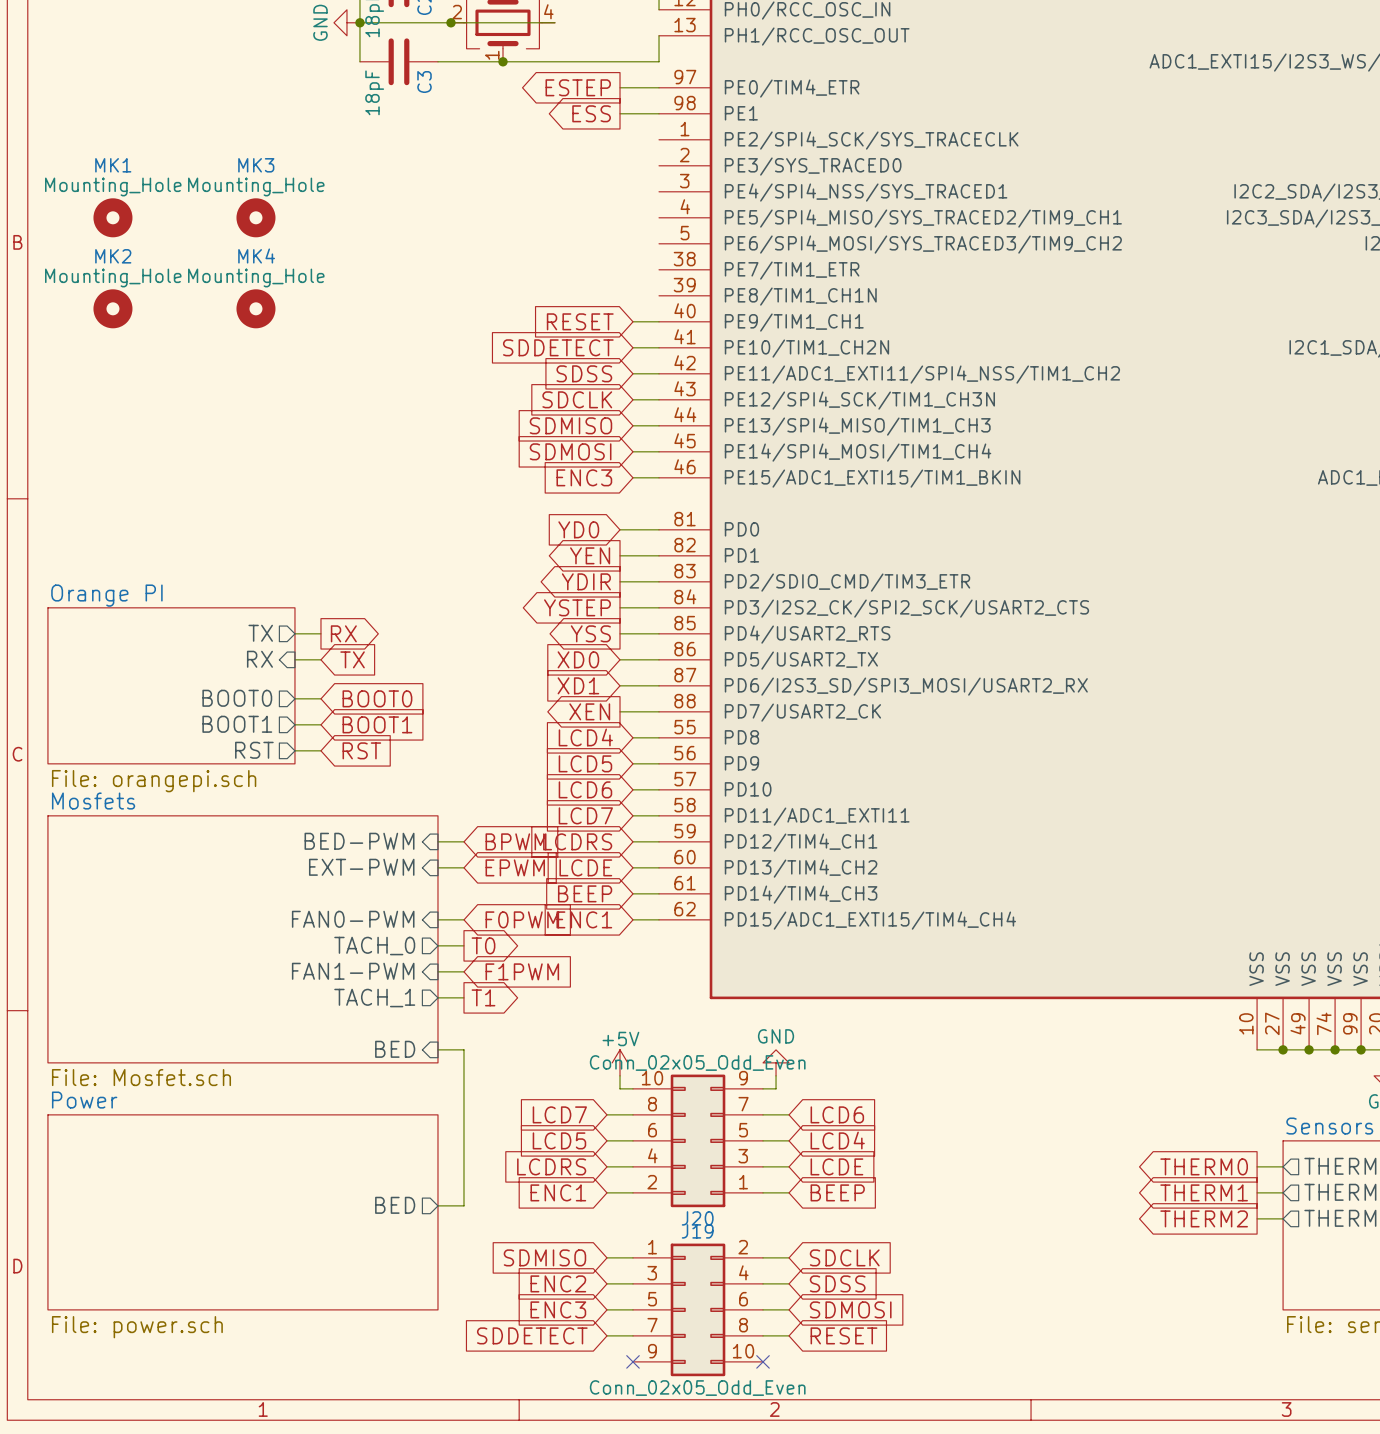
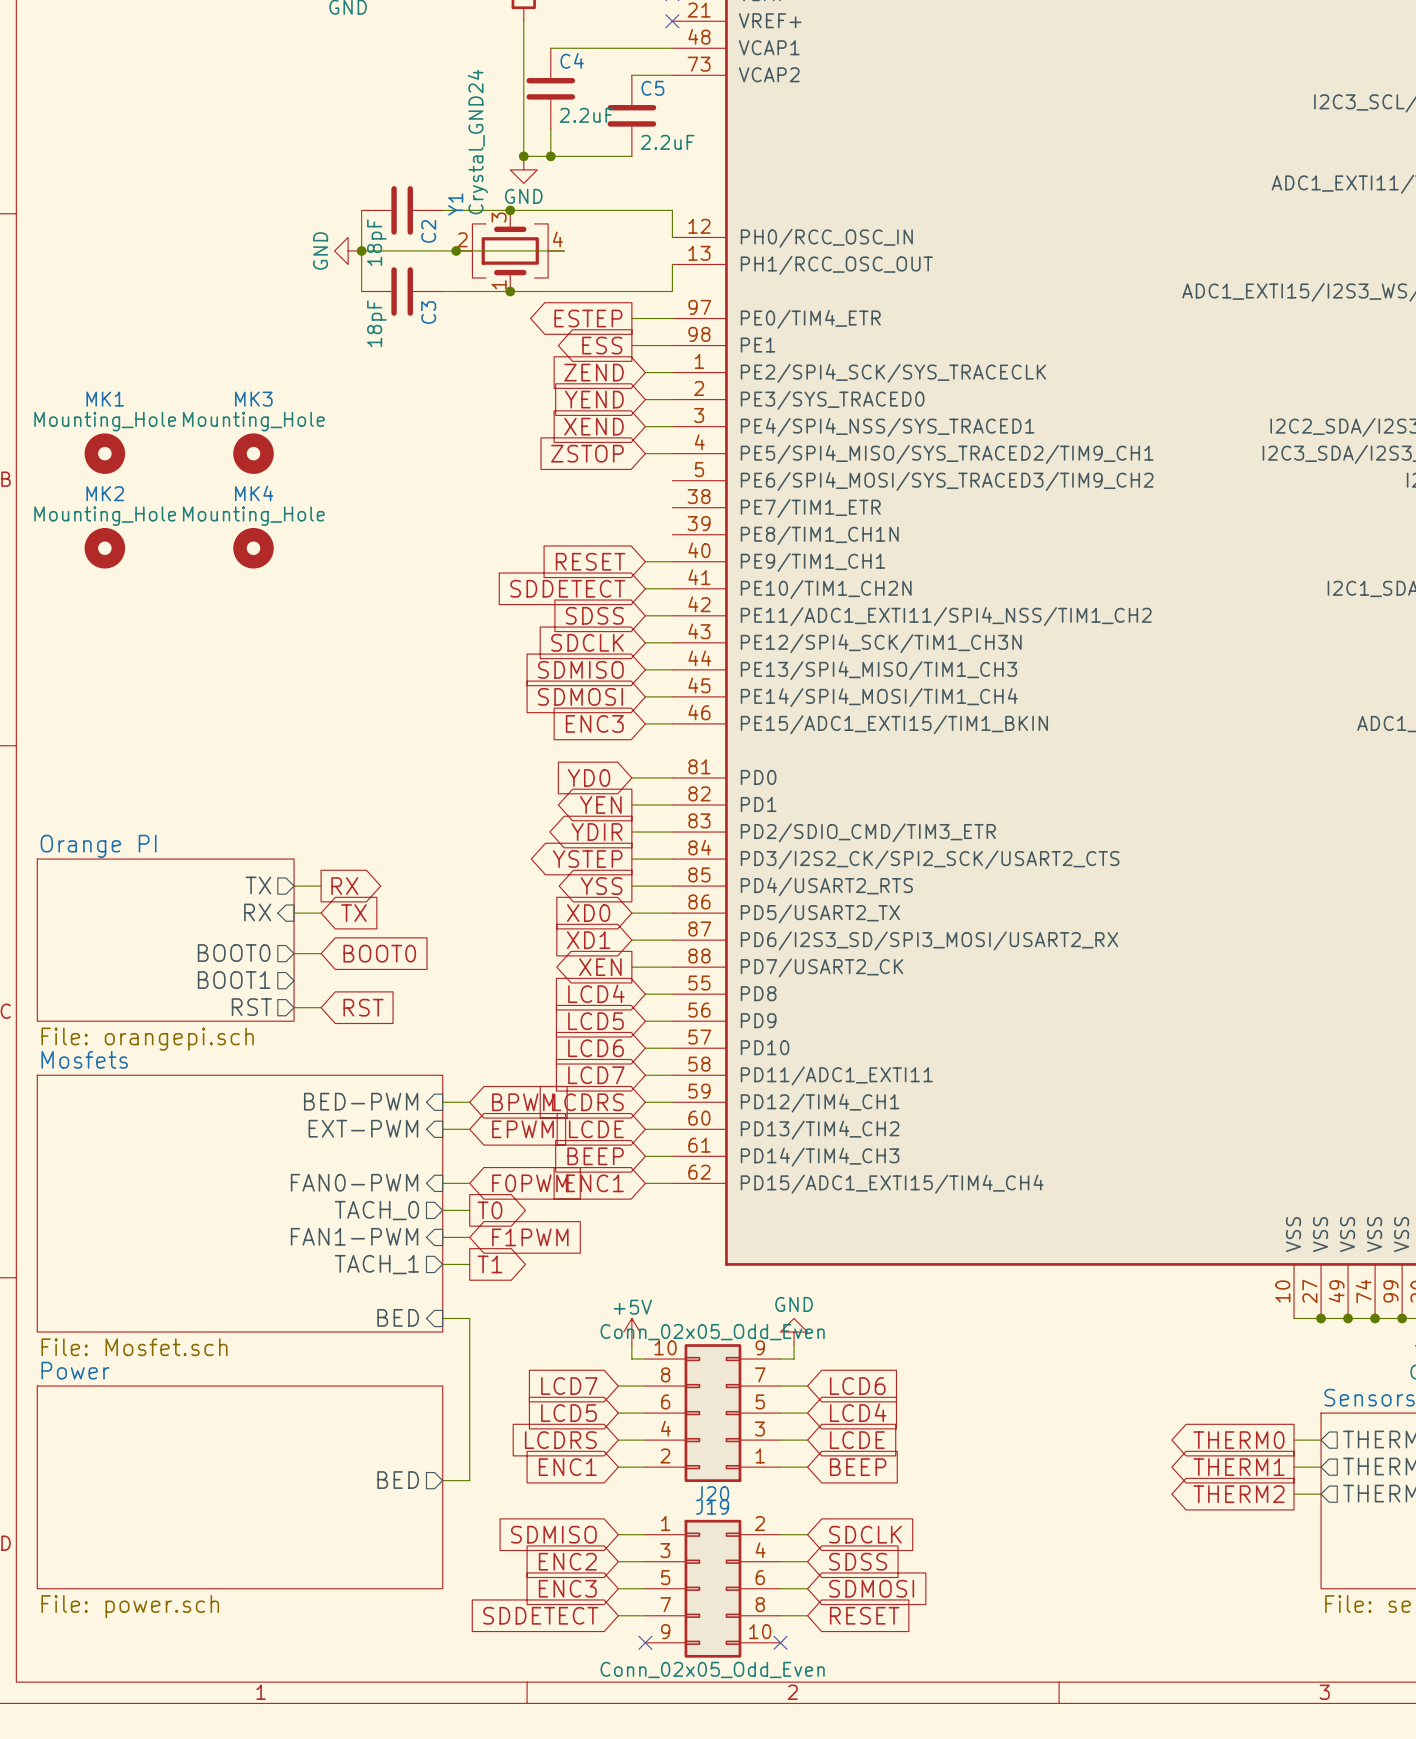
global label: none -> ZEND (594, 372)
wire: none -> (645, 372) (672, 372)
global label: none -> YEND (594, 399)
wire: none -> (645, 399) (672, 399)
global label: none -> XEND (594, 426)
wire: none -> (645, 426) (672, 426)
global label: none -> ZSTOP (587, 453)
wire: none -> (645, 453) (672, 453)
wire: (294, 724) (320, 724) -> none
global label: BOOT1 (377, 724) -> none

